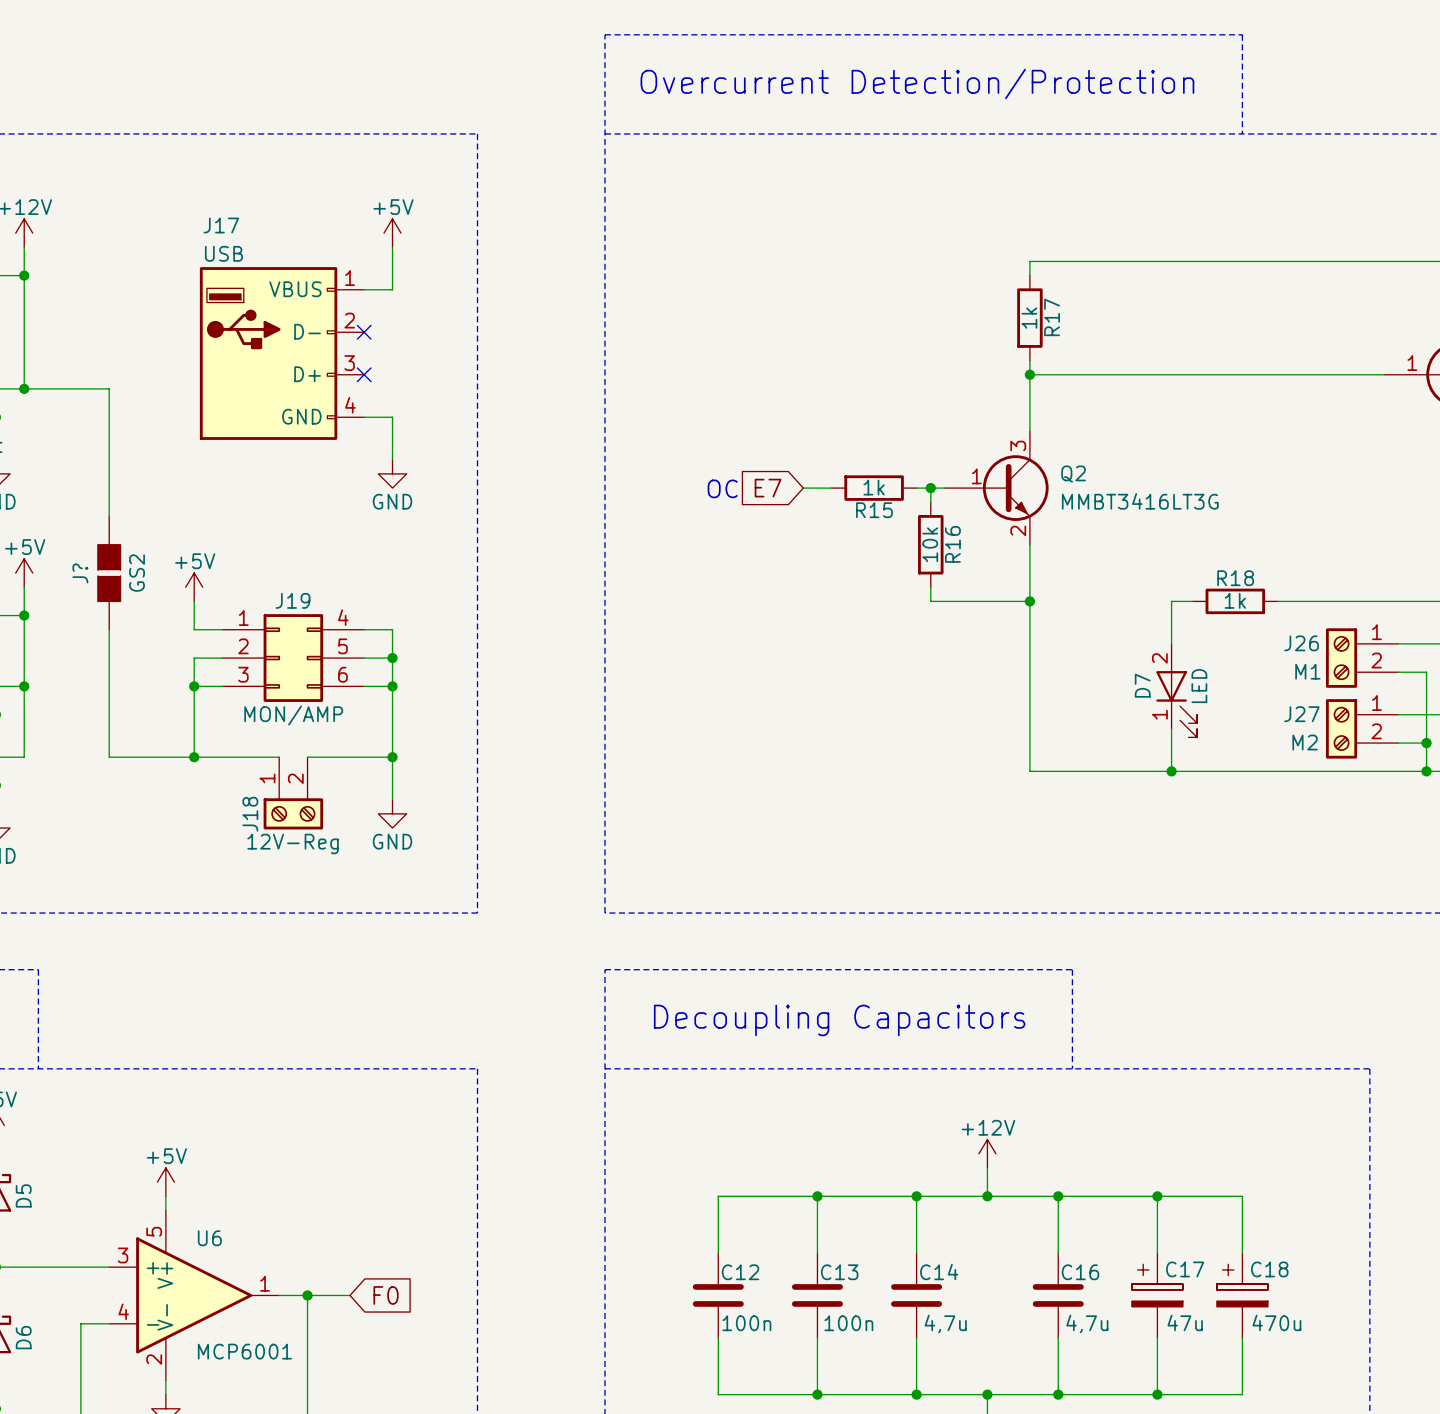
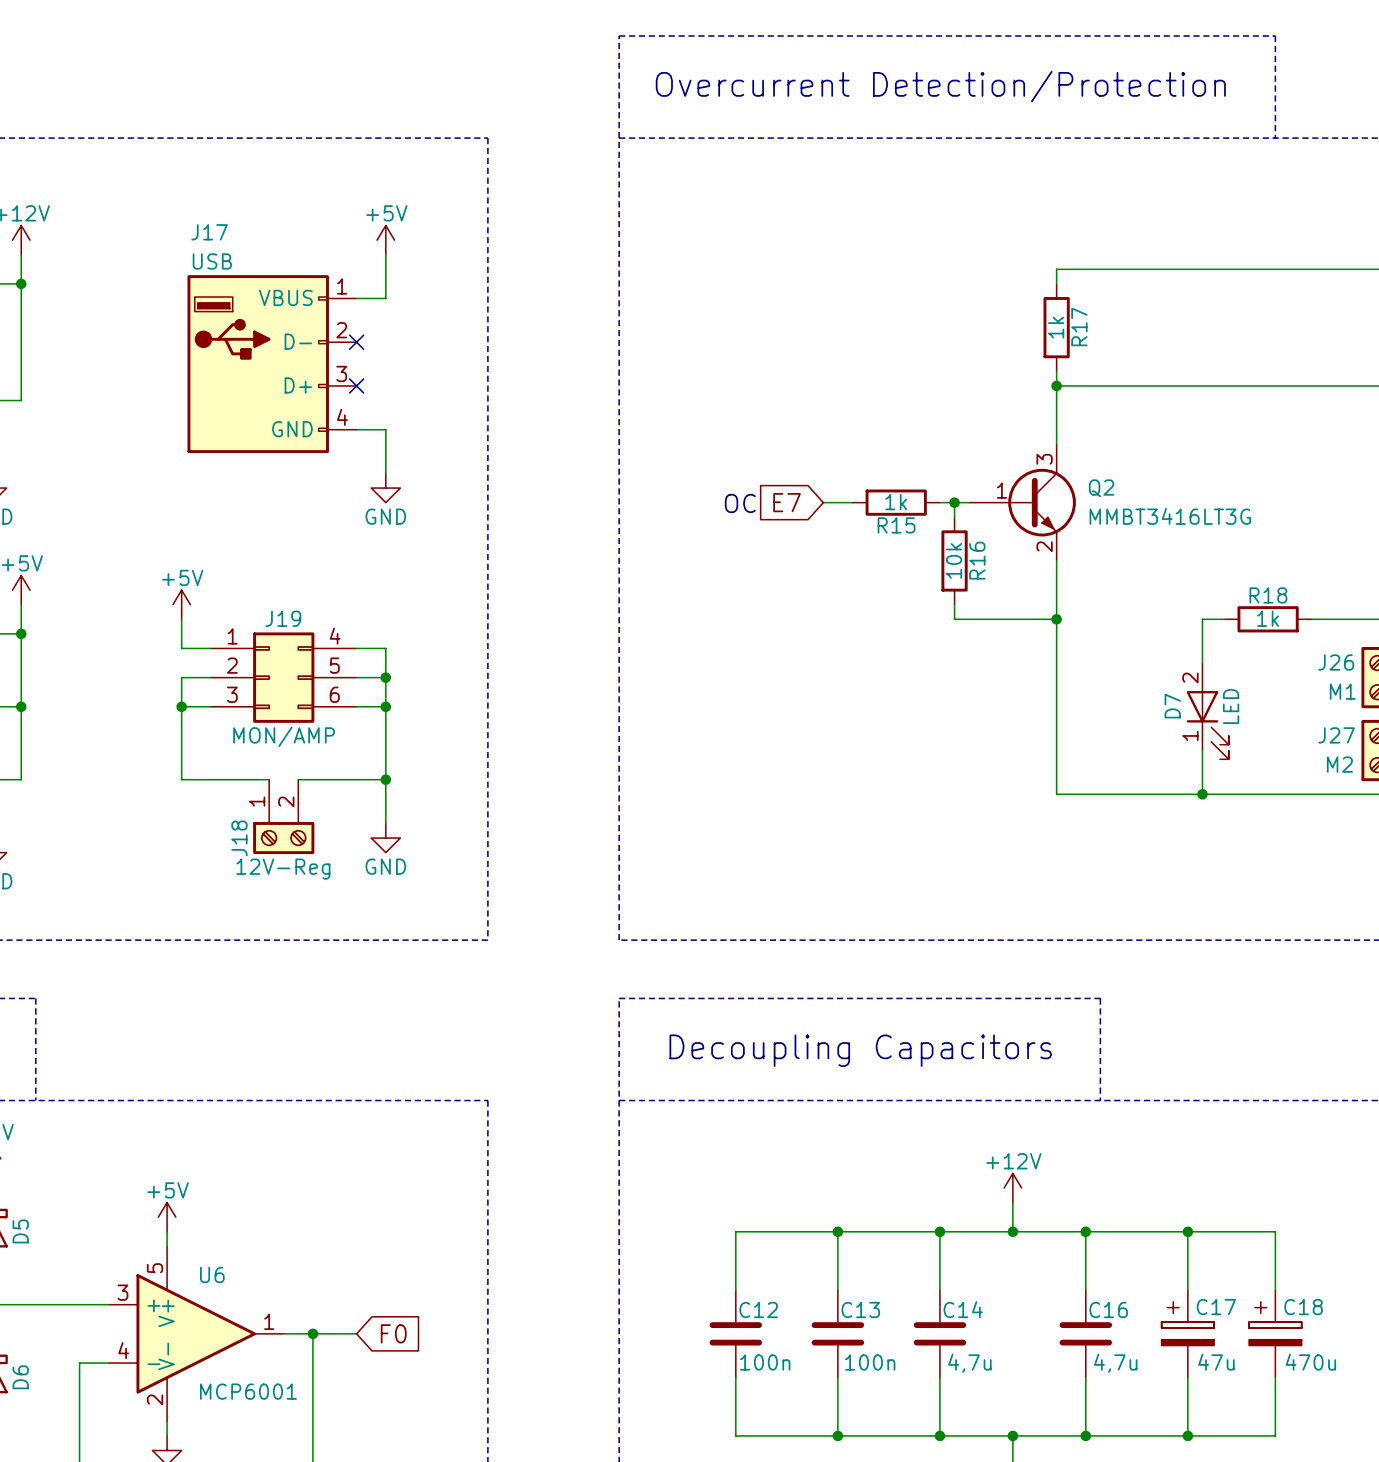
power symbol position: +5V (392, 233) -> +5V (385, 240)
wire: (392, 247) (392, 289) (378, 289) -> (385, 254) (385, 298)
no-connect mark position: (364, 332) -> (356, 342)
J17 position: (282, 353) -> (272, 364)
no-connect mark position: (364, 374) -> (356, 385)
wire: (24, 388) (109, 388) (109, 516) -> none
junction: (24, 388) -> none
wire: (378, 417) (392, 417) (392, 459) -> (385, 429) (385, 473)
power symbol position: GND (392, 473) -> GND (385, 488)
J?: GS2 (109, 573) -> none
power symbol position: +5V (194, 587) -> +5V (181, 604)
wire: (194, 601) (194, 629) -> (181, 619) (181, 648) (196, 648)
wire: (109, 629) (109, 757) (180, 757) -> none
wire: (378, 629) (392, 629) (392, 799) -> (385, 648) (385, 823)
wire: (194, 658) (194, 757) -> (196, 677) (181, 677) (181, 779)
J19 position: (293, 658) -> (283, 677)
junction position: (392, 658) -> (385, 677)
junction position: (194, 686) -> (181, 706)
junction position: (392, 686) -> (385, 706)
junction: (194, 757) -> none
wire: (265, 757) (279, 757) -> (298, 779) (312, 779)
wire: (378, 757) (392, 757) -> none
junction position: (392, 757) -> (385, 779)
J18 position: (293, 793) -> (283, 816)
power symbol position: GND (392, 813) -> GND (385, 838)

